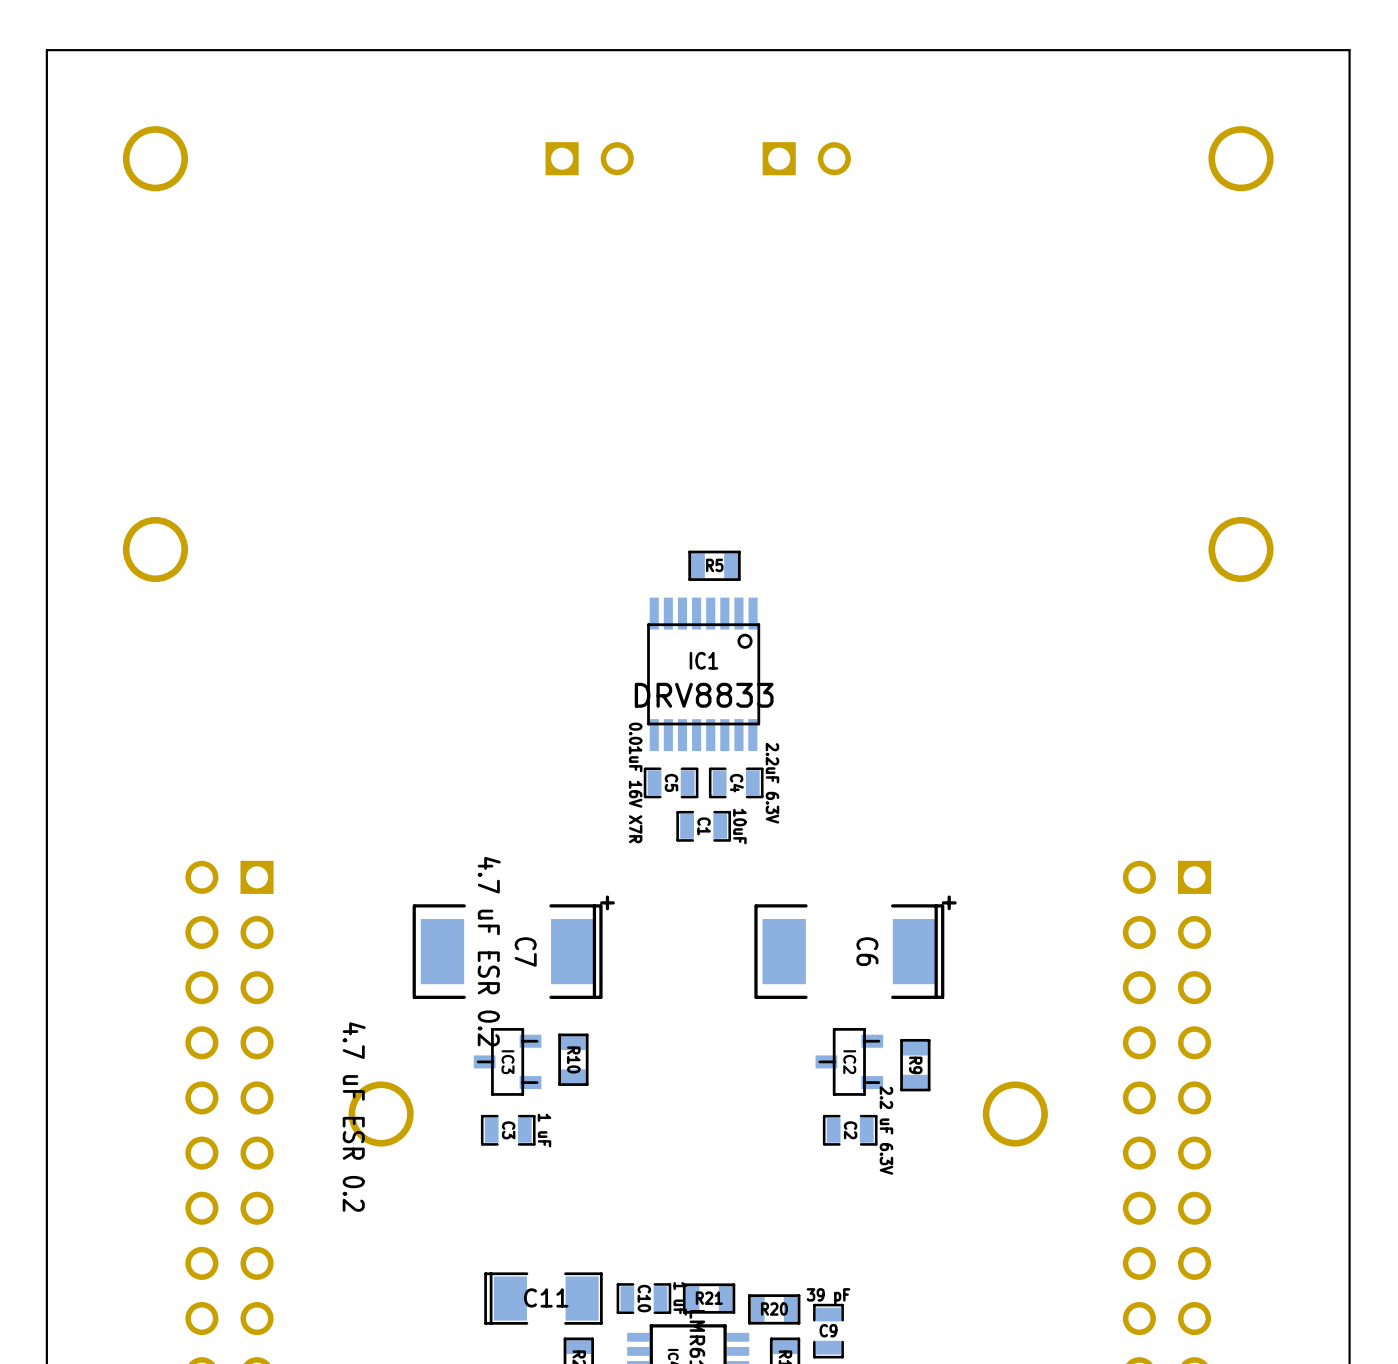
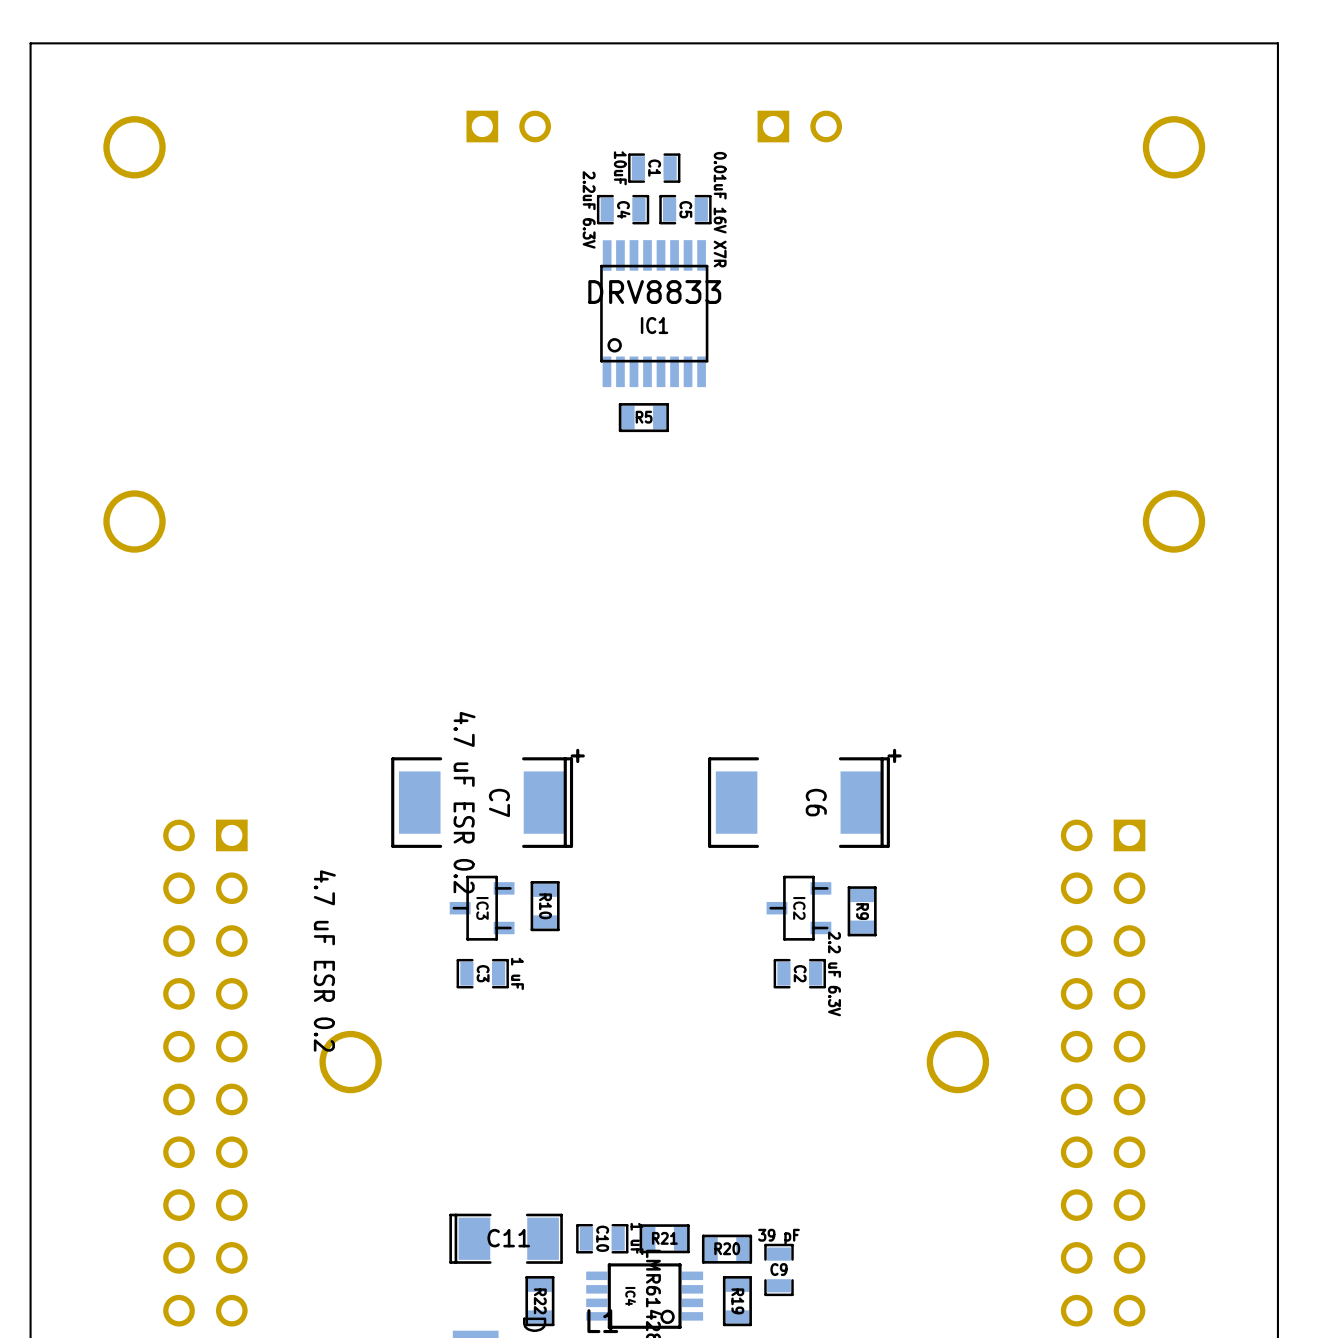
part position: (589, 158) -> (508, 126)
part position: (806, 158) -> (799, 126)
R5 position: (714, 565) -> (643, 417)
IC1 rotation: 0° (703, 674) -> 180° (654, 313)
IC1 position: (703, 674) -> (654, 313)
C5 value position: 0.01uF 16V X7R (635, 782) -> 0.01uF 16V X7R (720, 209)
C5 position: (671, 782) -> (685, 209)
C4 position: (736, 782) -> (623, 209)
C4 value position: 2.2uF 6.3V (772, 783) -> 2.2uF 6.3V (589, 209)
C1 position: (703, 826) -> (654, 168)
C1 value position: 10uF (739, 826) -> 10uF (620, 168)
C7 position: (507, 951) -> (482, 802)
C6 position: (849, 951) -> (798, 802)
R10 position: (573, 1059) -> (545, 906)
IC3 position: (507, 1061) -> (482, 908)
IC2 position: (849, 1061) -> (798, 908)
R9 position: (915, 1065) -> (862, 911)
C3 position: (508, 1130) -> (482, 973)
C2 position: (850, 1130) -> (799, 973)

